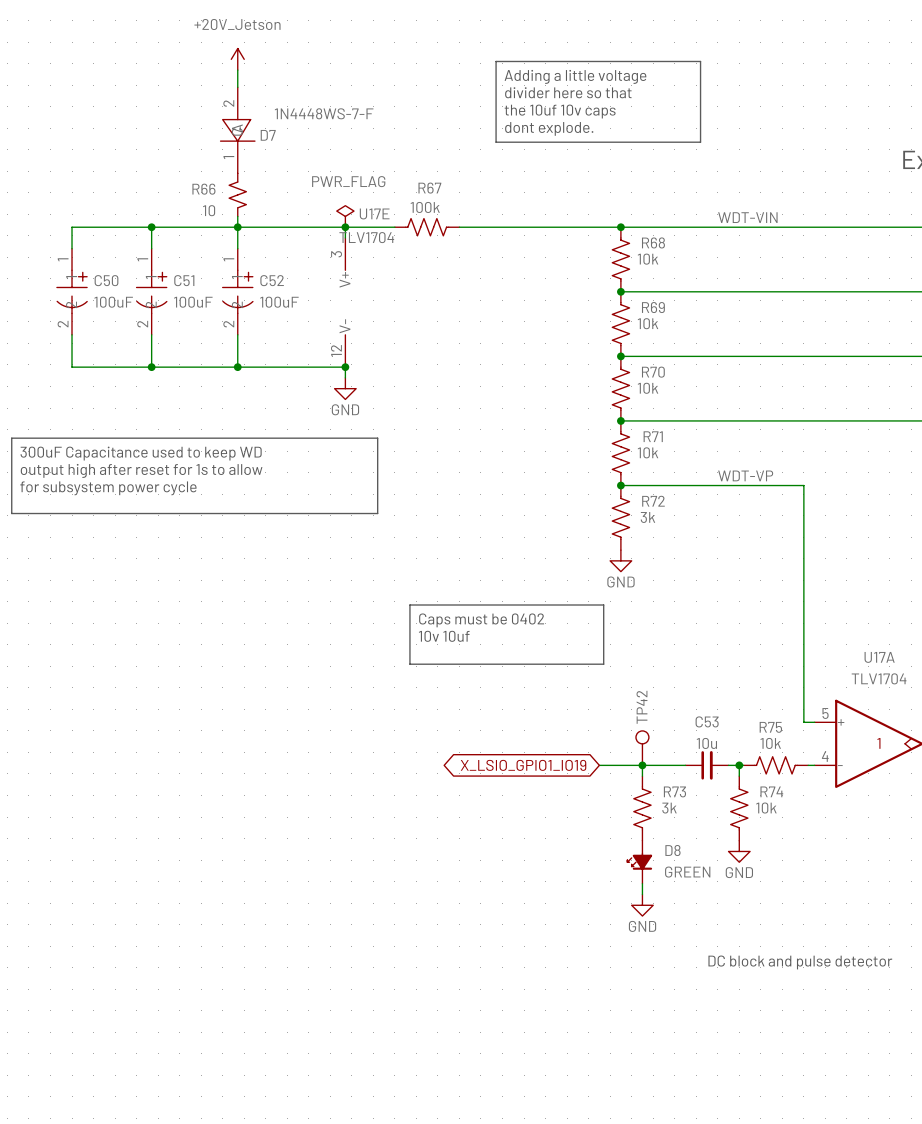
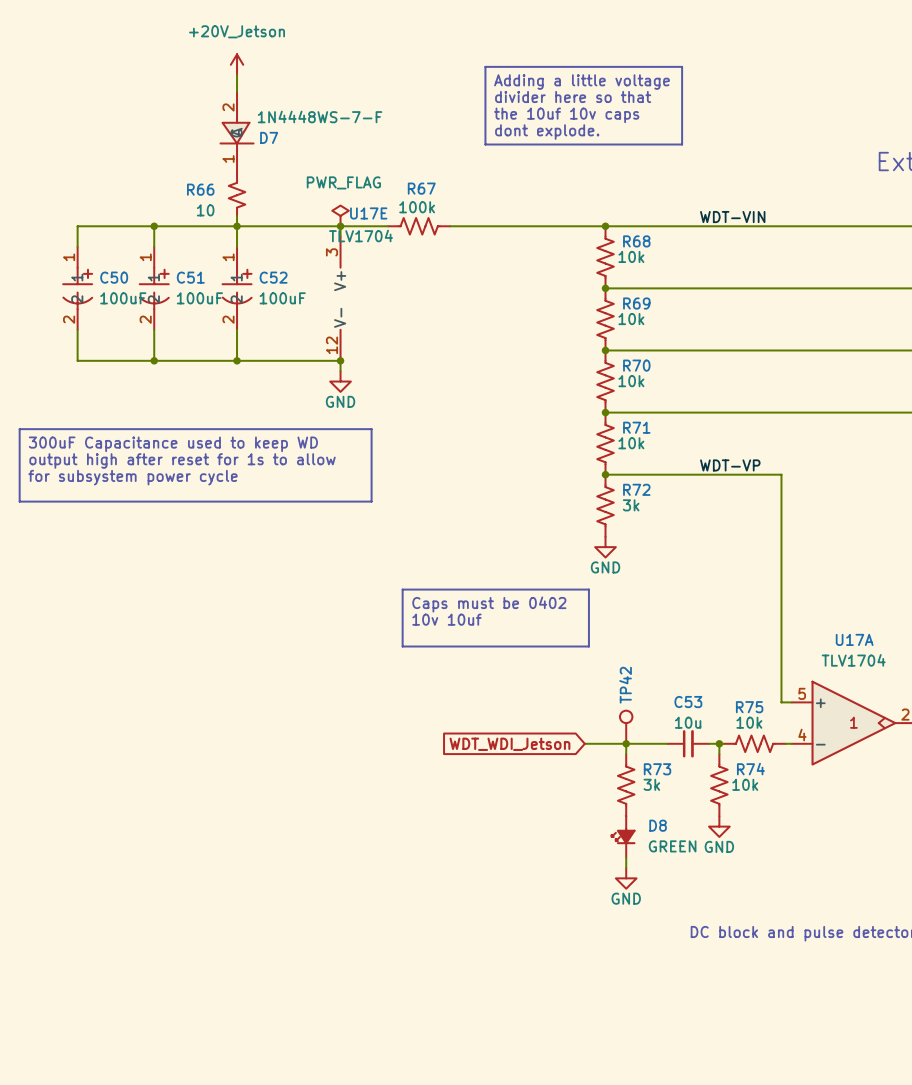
global label shape: bidirectional (523, 765) -> input (509, 744)
global label: X_LSIO_GPIO1_IO19 (523, 765) -> WDT_WDI_Jetson (509, 744)

